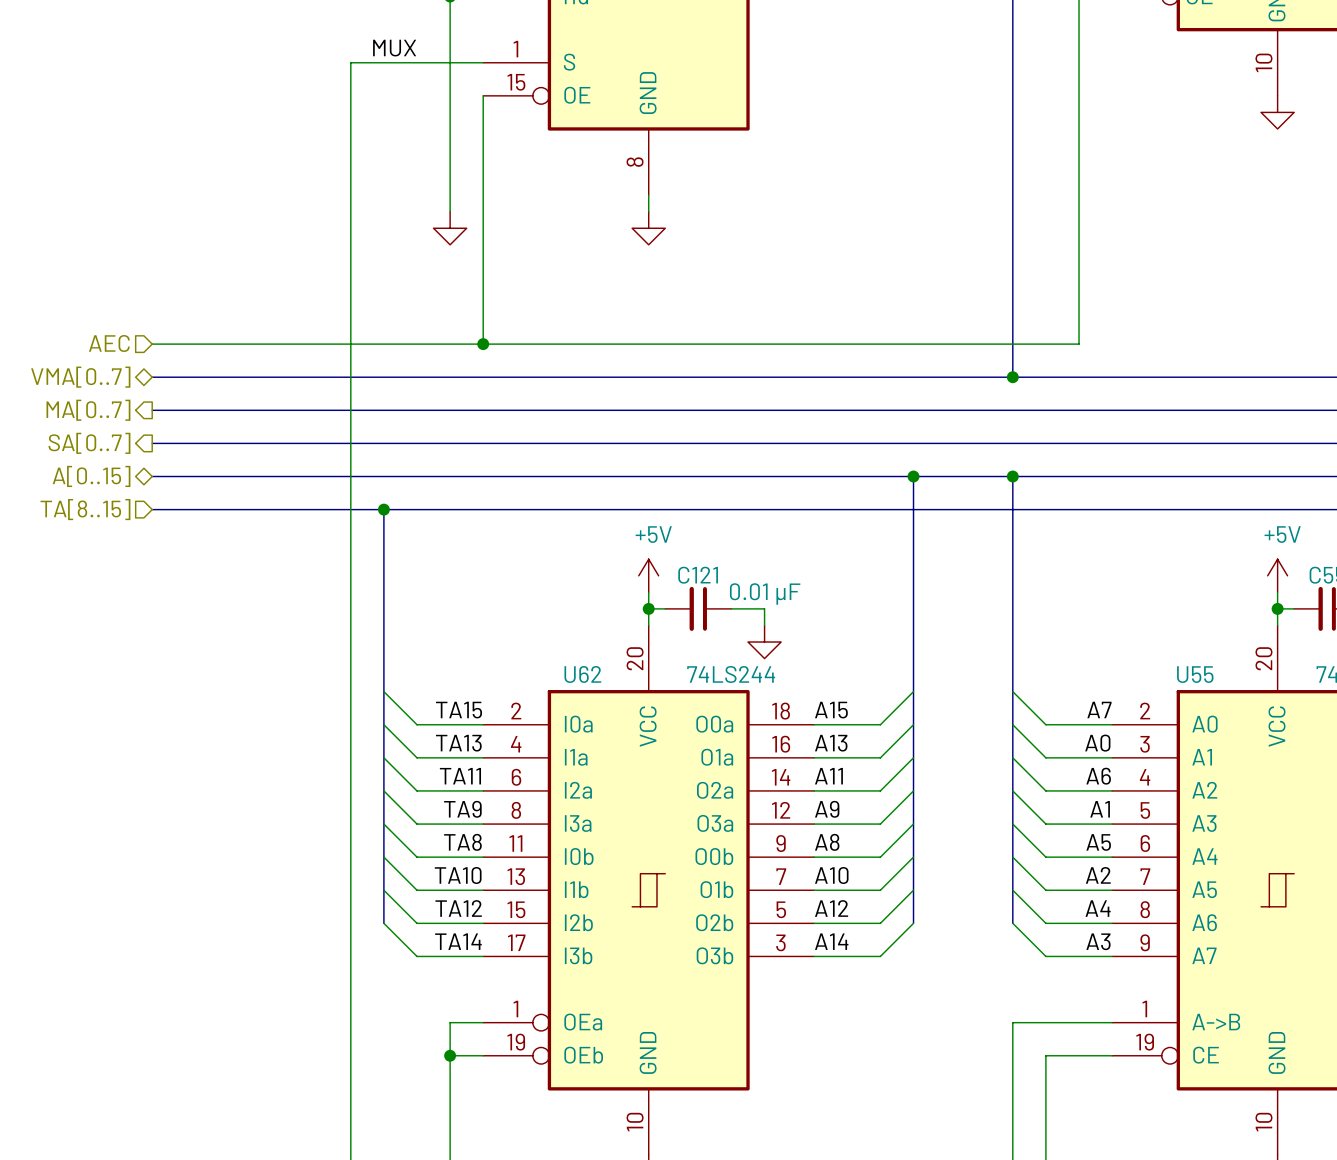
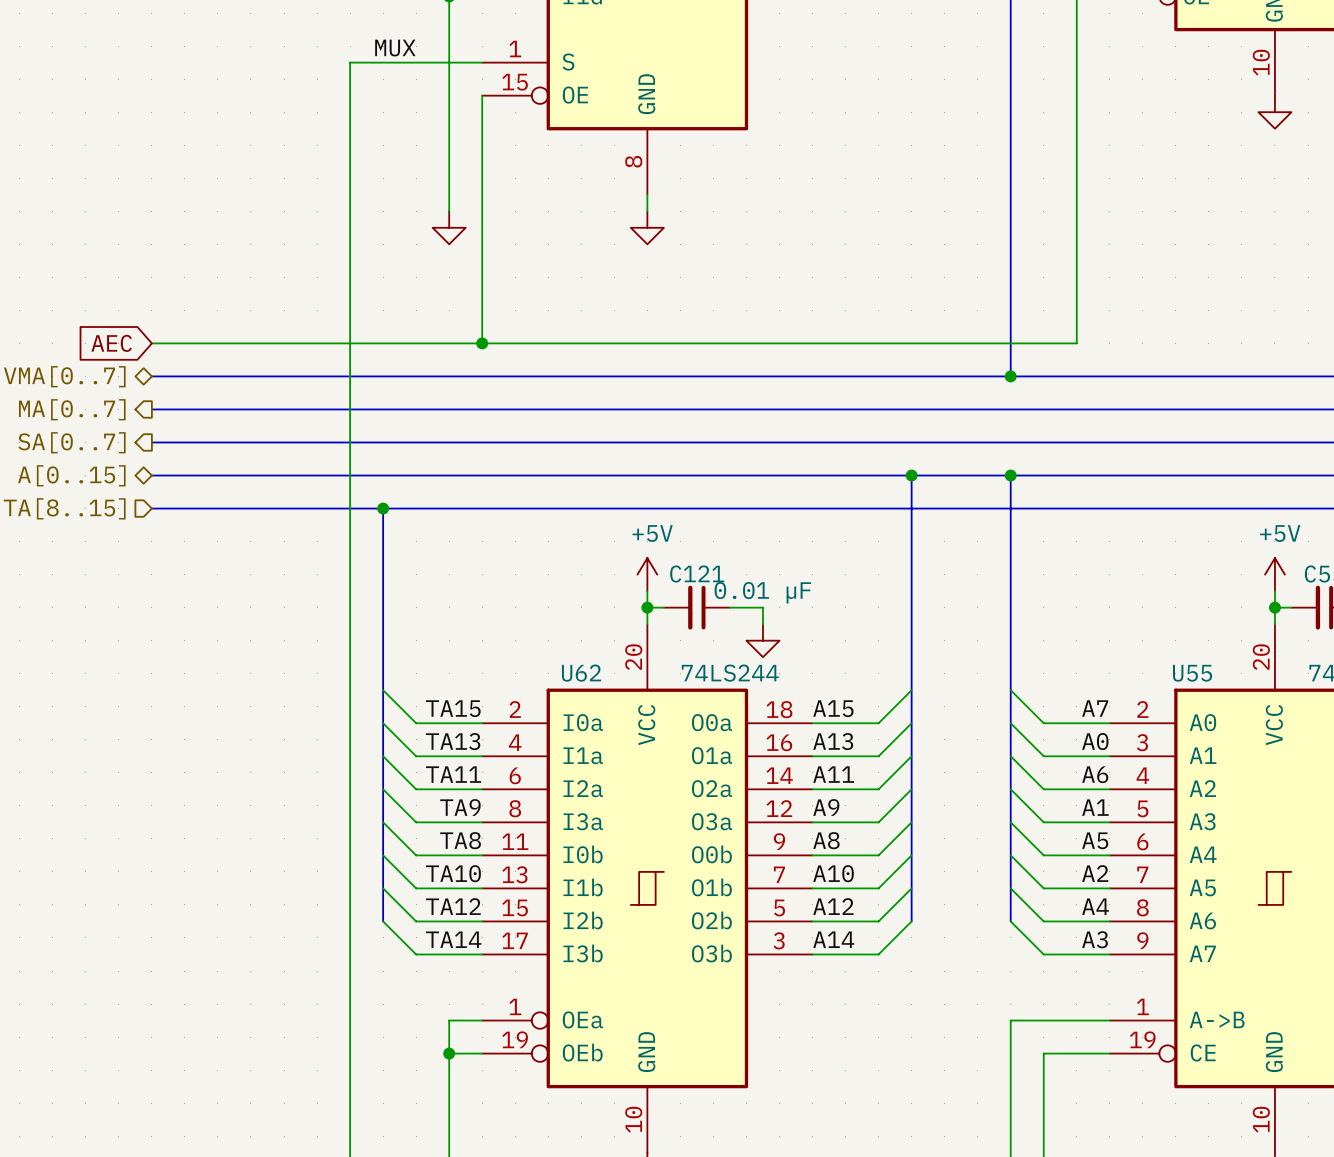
hierarchical label: AEC (109, 343) -> none
global label: none -> AEC (111, 343)

